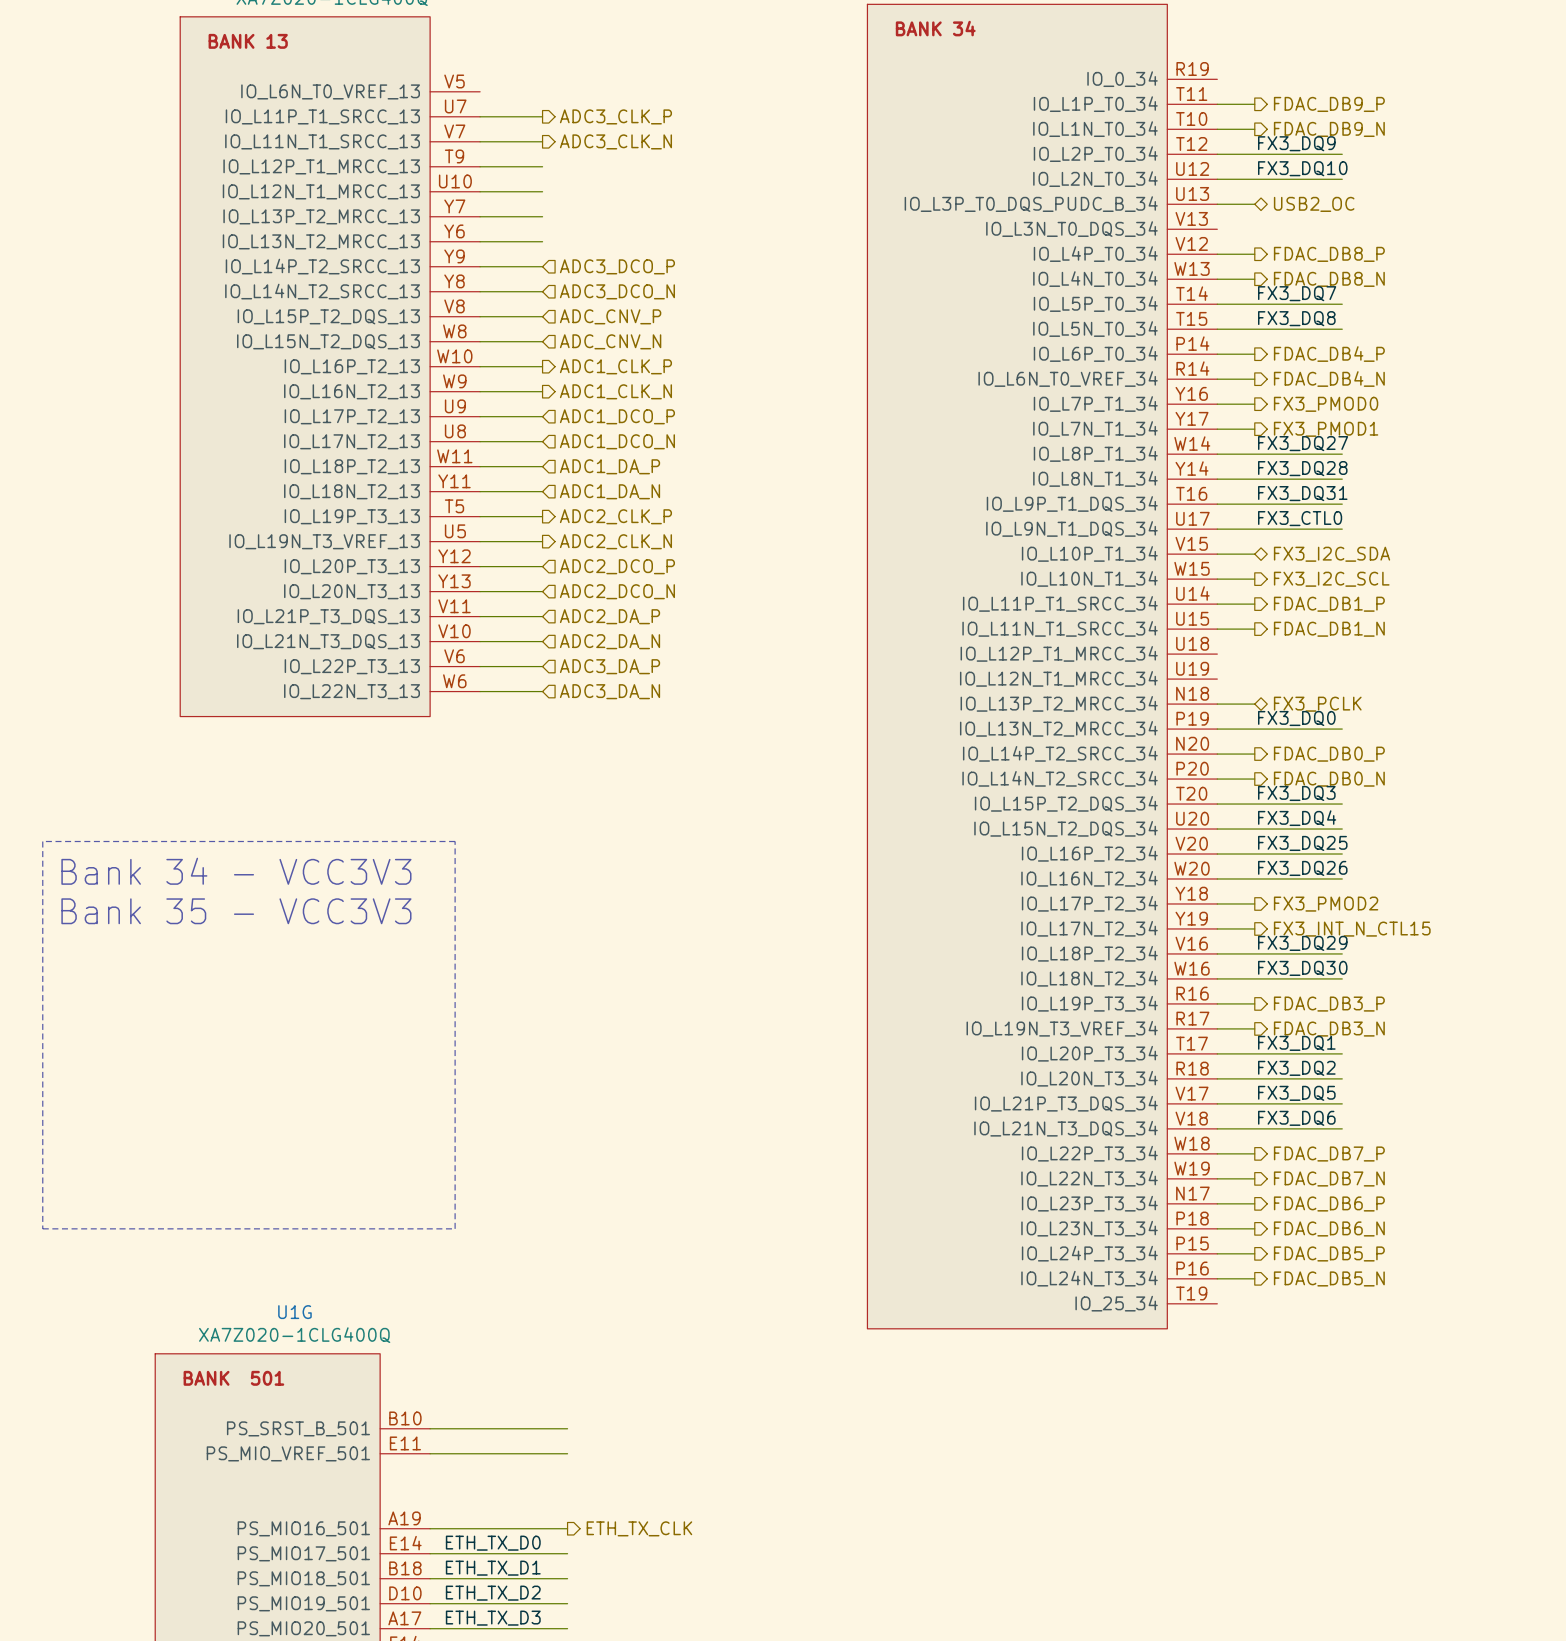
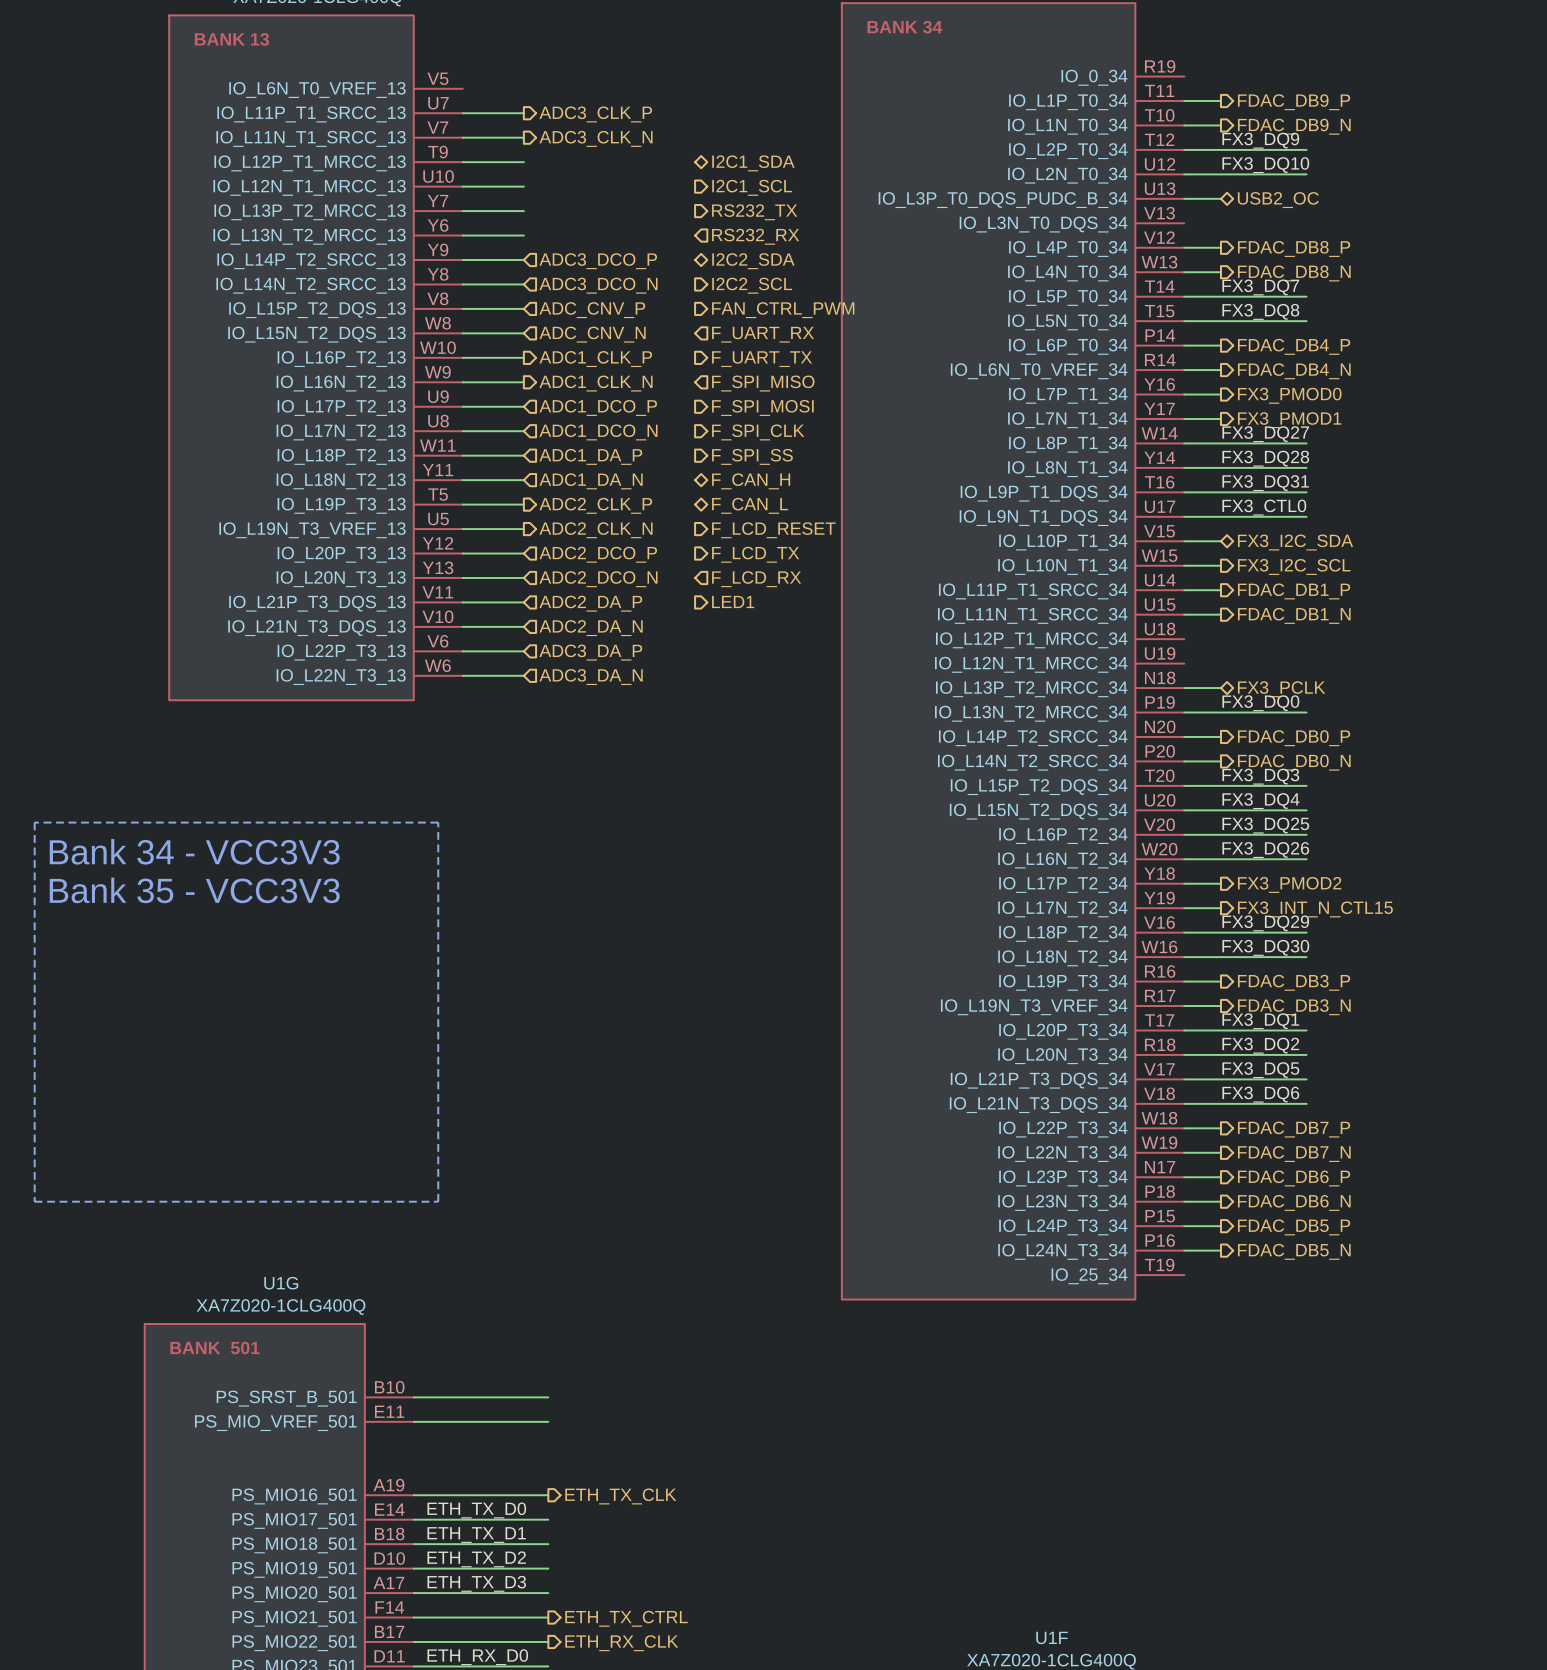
hierarchical label: none -> I2C1_SDA (753, 163)
hierarchical label: none -> I2C1_SCL (752, 187)
hierarchical label: none -> RS232_TX (754, 212)
hierarchical label: none -> RS232_RX (755, 236)
hierarchical label: none -> I2C2_SDA (753, 261)
hierarchical label: none -> I2C2_SCL (752, 285)
hierarchical label: none -> FAN_CTRL_PWM (783, 310)
hierarchical label: none -> F_UART_RX (763, 334)
hierarchical label: none -> F_UART_TX (762, 359)
hierarchical label: none -> F_SPI_MISO (763, 383)
hierarchical label: none -> F_SPI_MOSI (762, 407)
hierarchical label: none -> F_SPI_CLK (758, 432)
hierarchical label: none -> F_SPI_SS (752, 456)
hierarchical label: none -> F_CAN_H (751, 481)
hierarchical label: none -> F_CAN_L (750, 505)
hierarchical label: none -> F_LCD_RESET (773, 530)
hierarchical label: none -> F_LCD_TX (755, 554)
hierarchical label: none -> F_LCD_RX (756, 579)
hierarchical label: none -> LED1 (733, 601)

